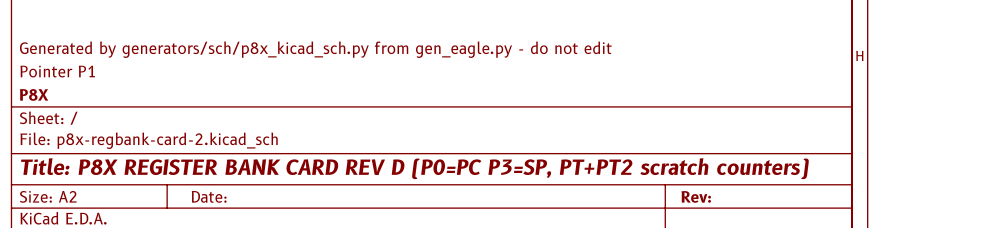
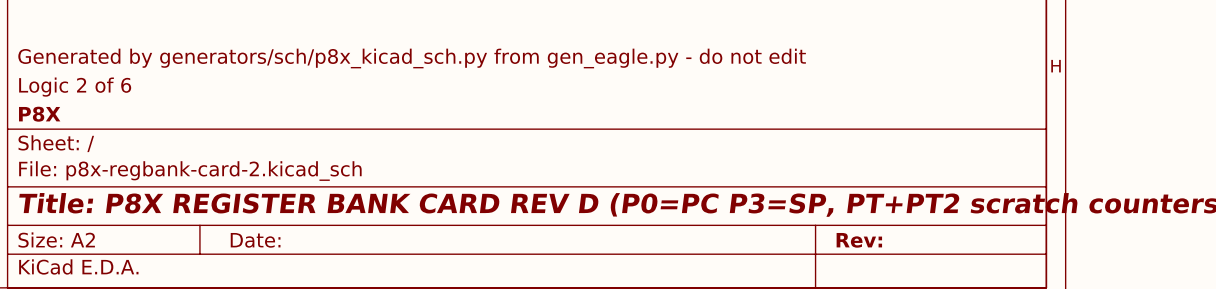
title block: Pointer P1 (57, 71) -> Logic 2 of 6 (75, 87)

